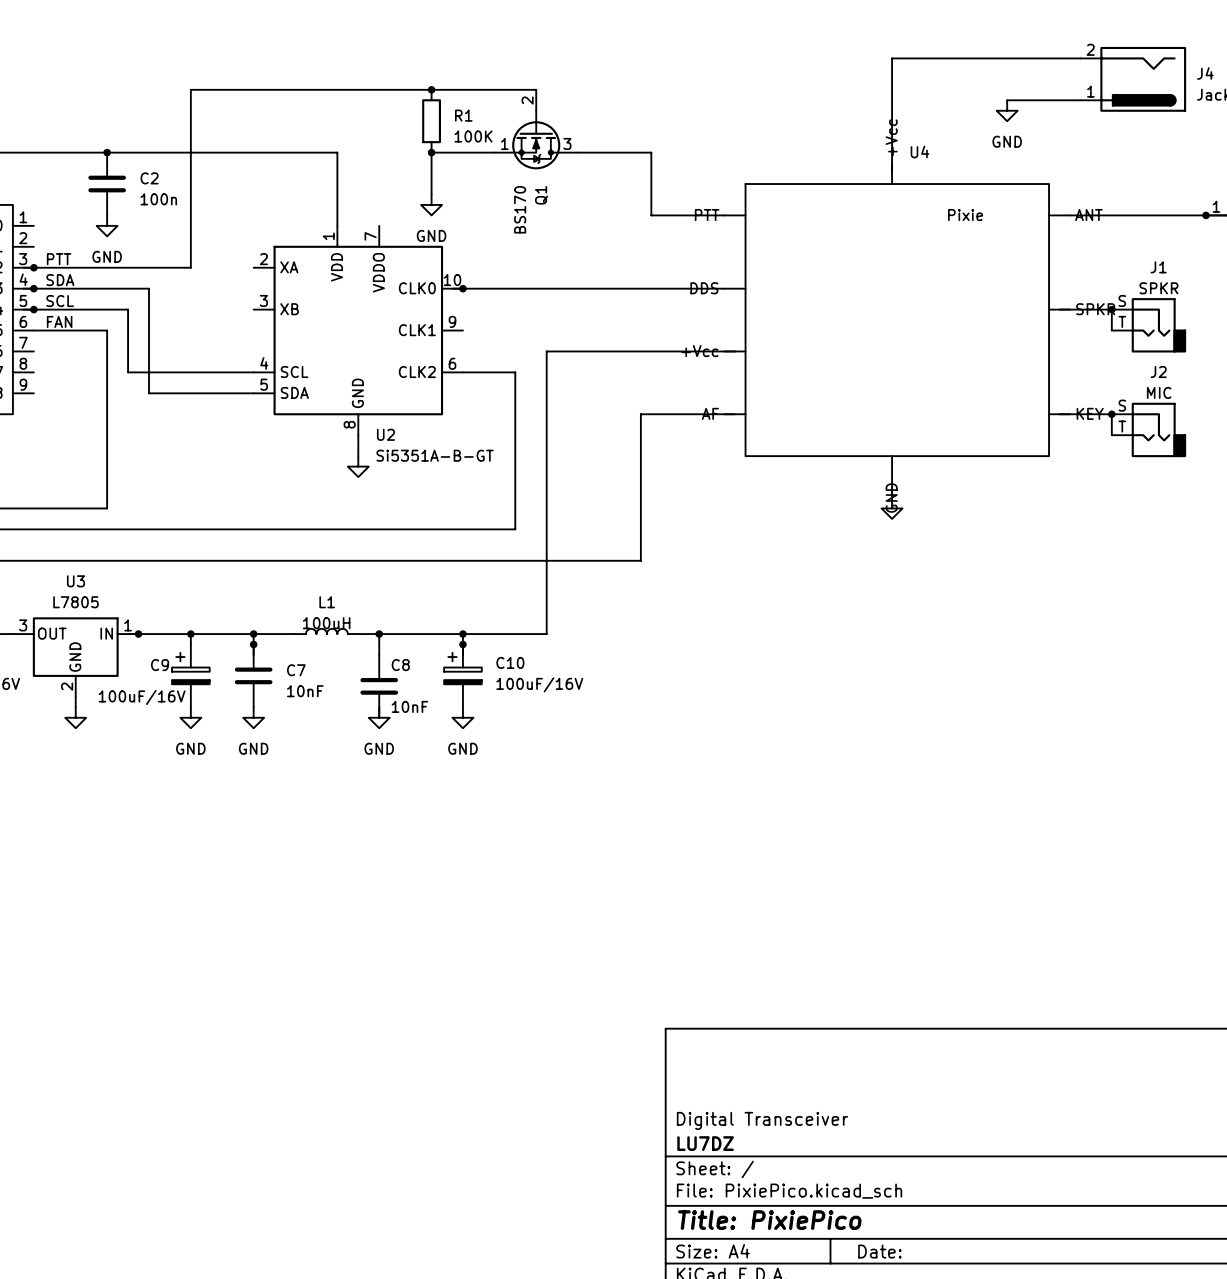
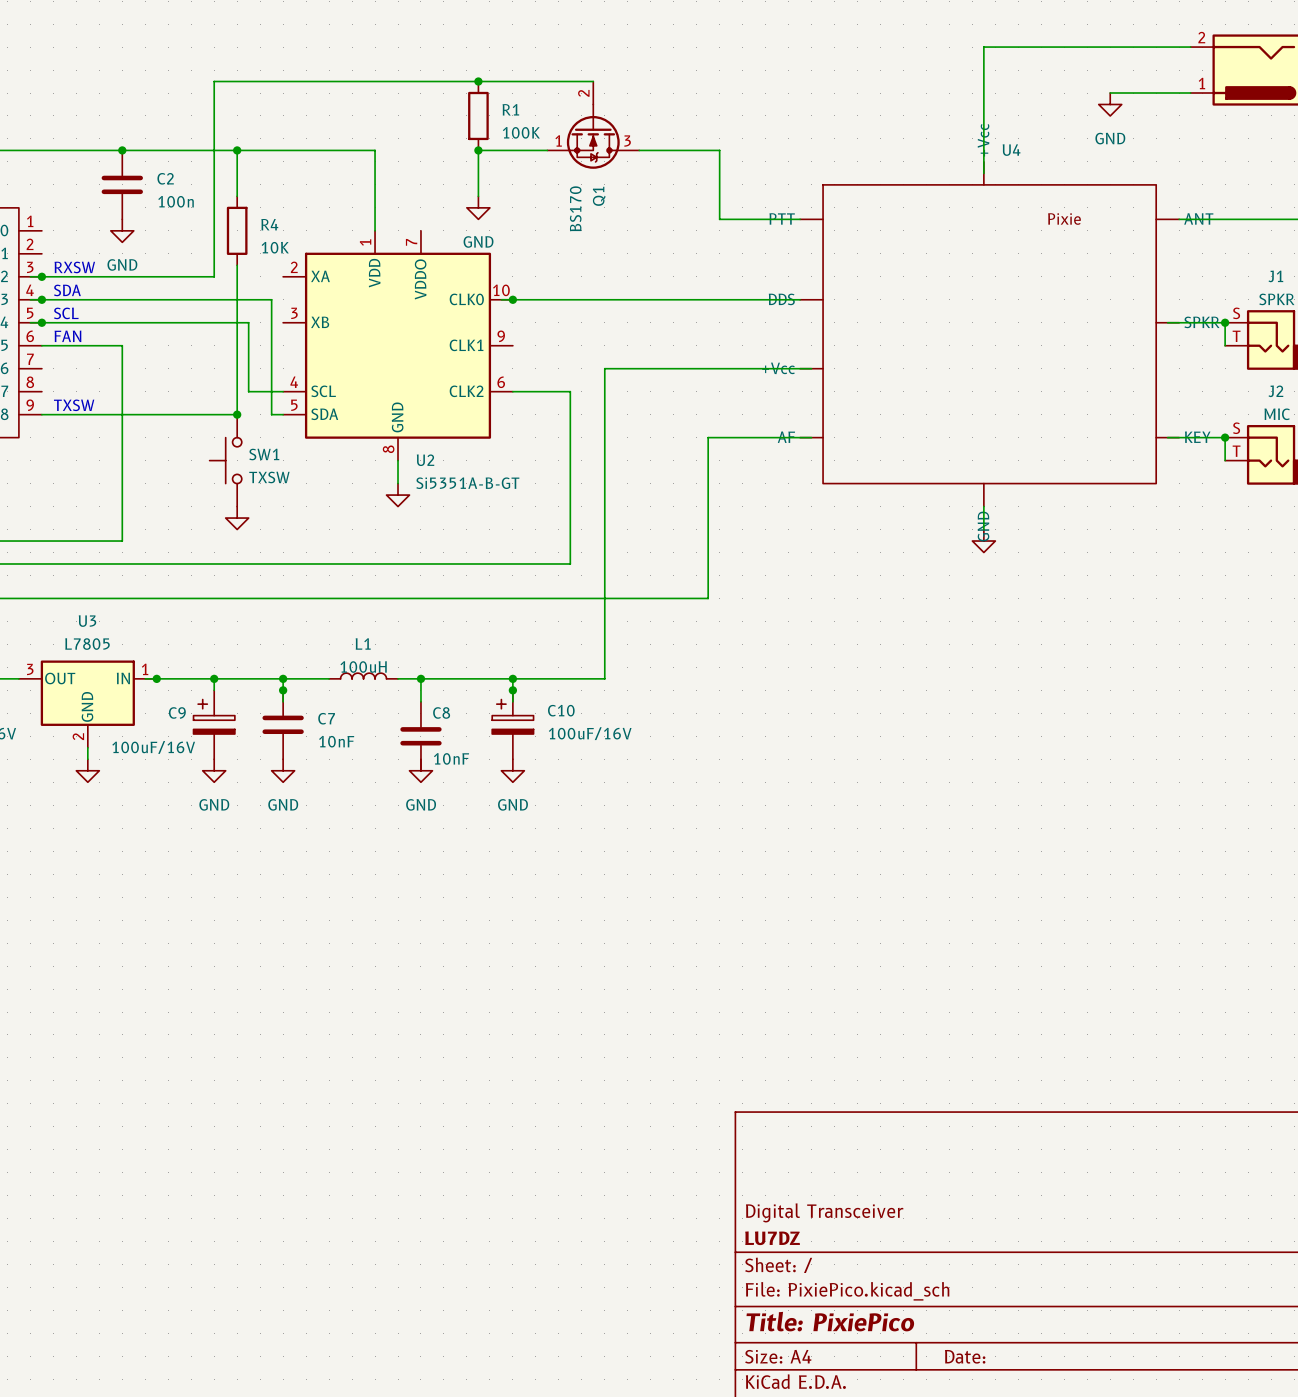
wire: none -> (237, 150) (237, 196)
junction: none -> (237, 150)
R4: none -> 10K (237, 230)
text: PTT (59, 259) -> RXSW (74, 267)
wire: (149, 288) (149, 393) -> (168, 299) (271, 299) (271, 414)
wire: (128, 309) (128, 372) (222, 372) -> (145, 322) (248, 322) (248, 391)
text: none -> TXSW (74, 405)
wire: none -> (41, 414) (168, 414)
wire: (211, 393) (243, 393) -> (237, 414) (237, 265)
junction: none -> (237, 414)
SW1: none -> TXSW (225, 460)
power symbol: none -> (237, 518)

